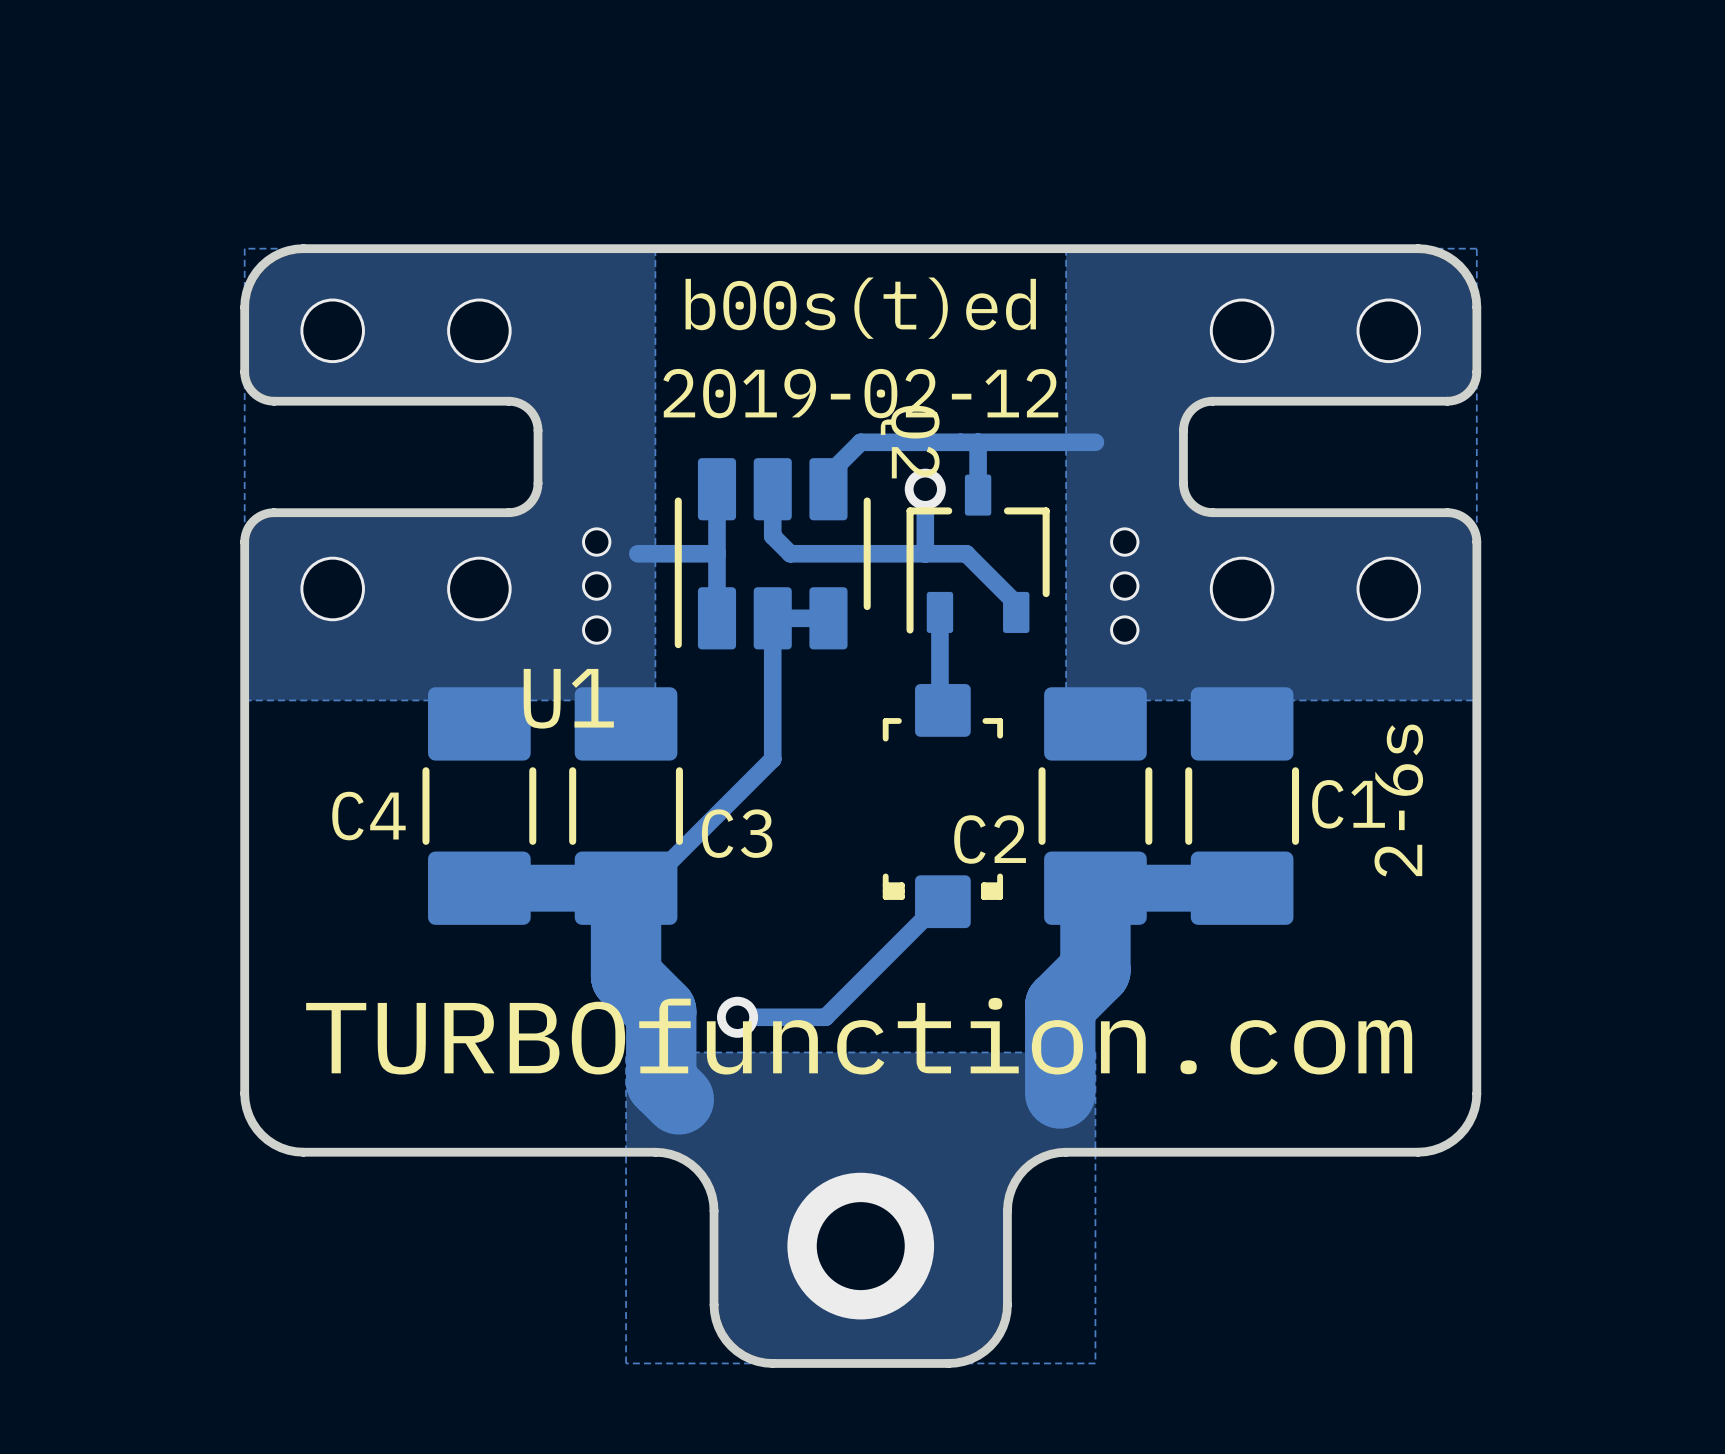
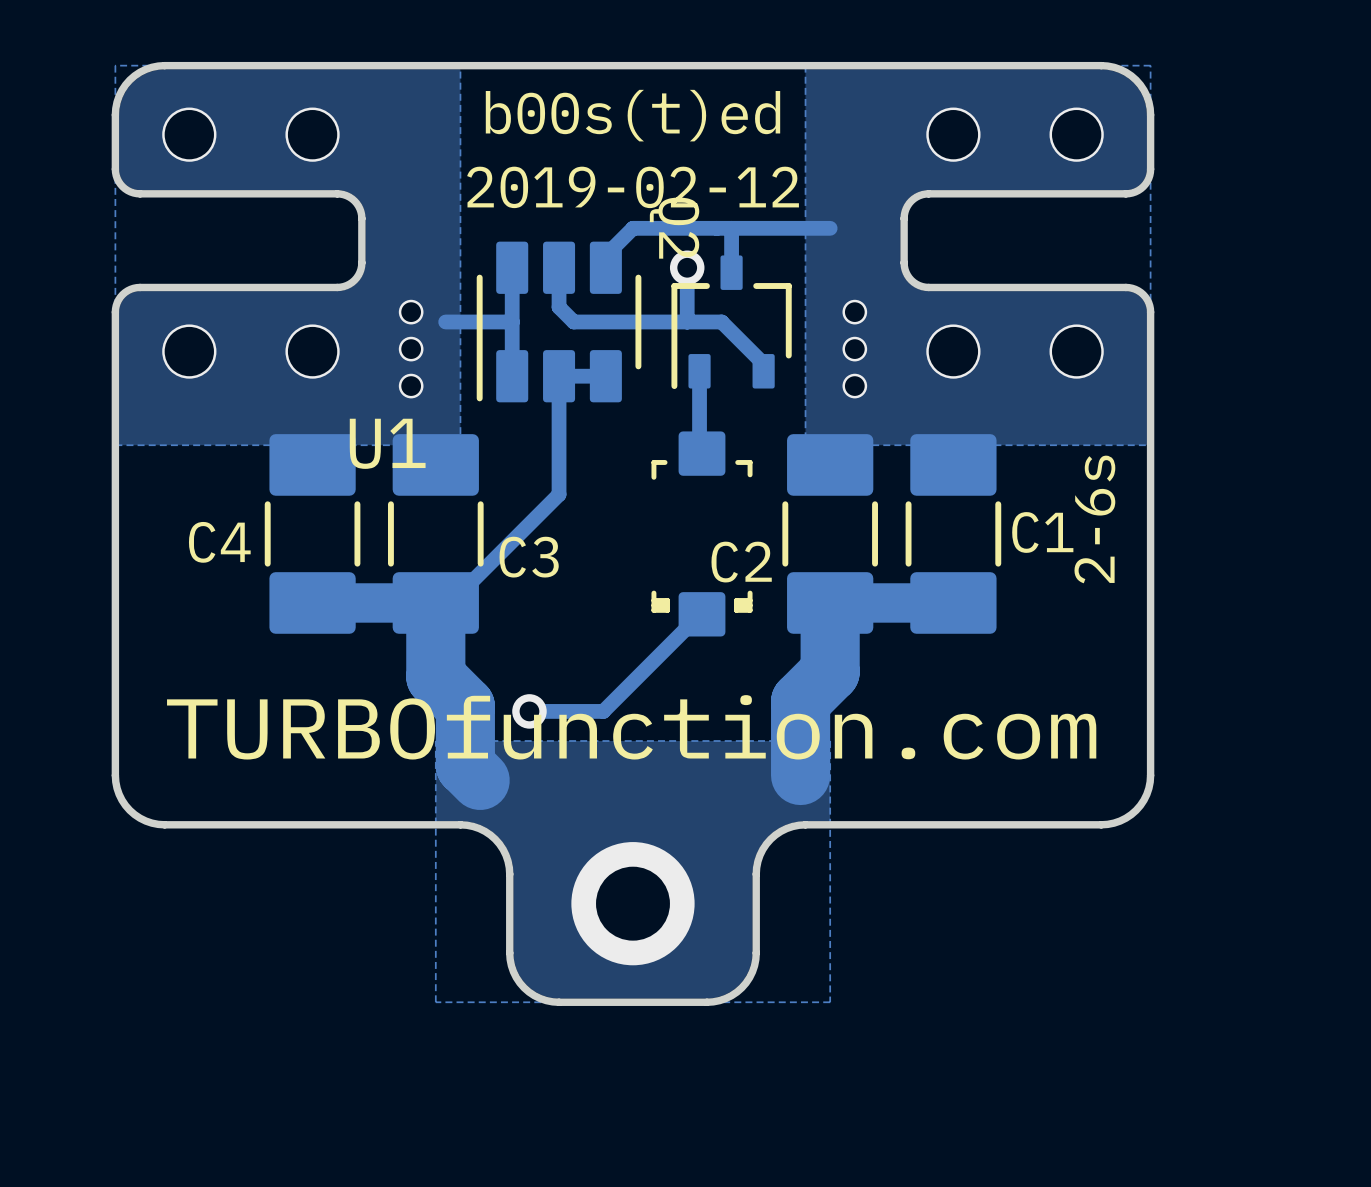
text position: 2-6s (1398, 800) -> 2-6s (1094, 519)

